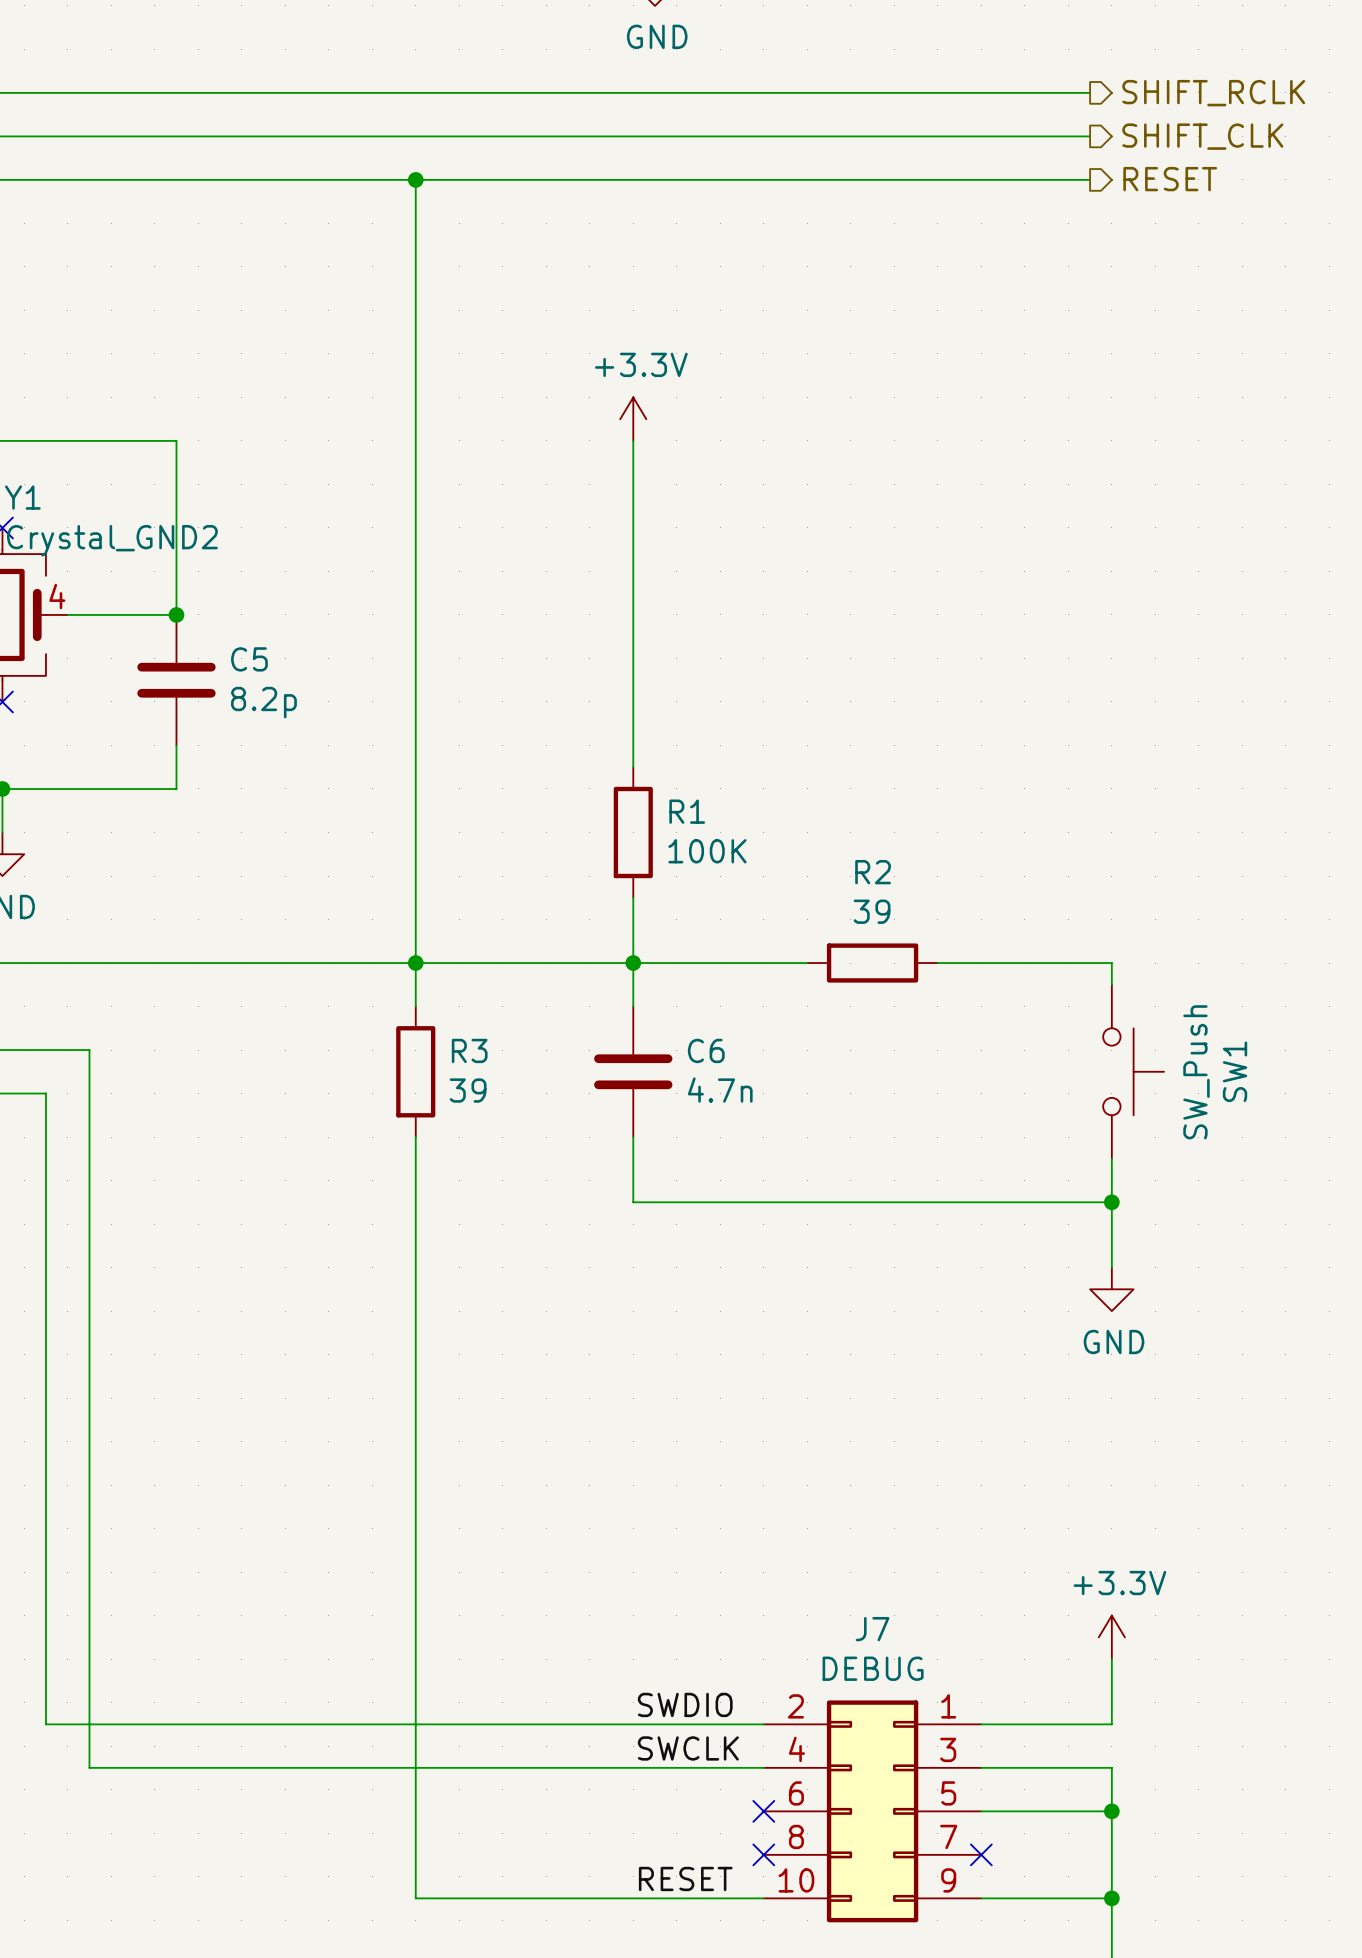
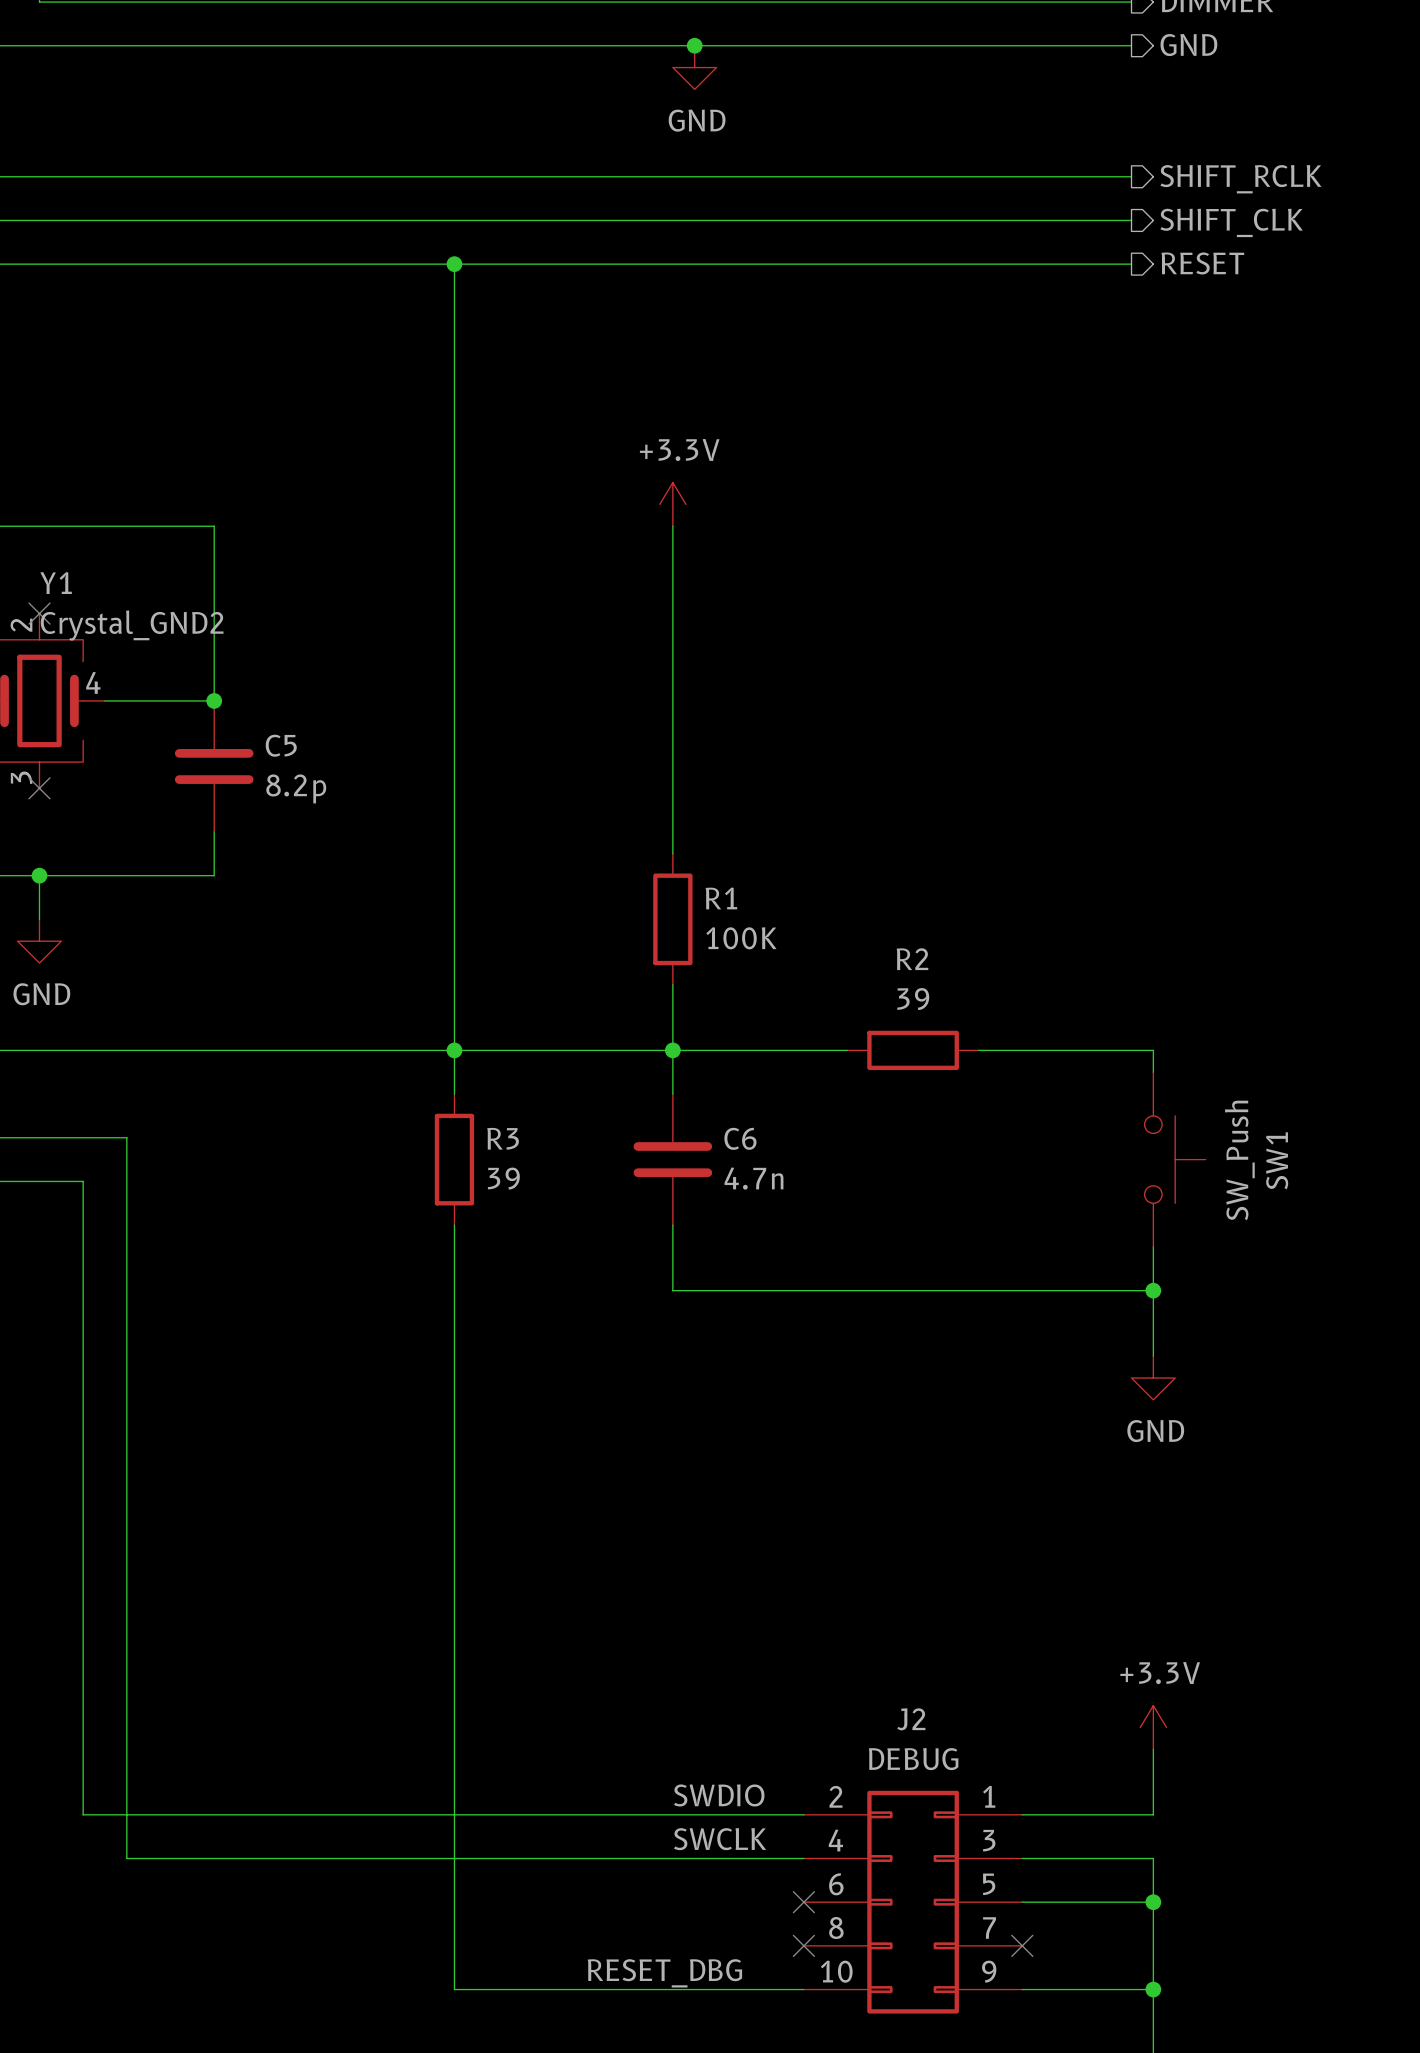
J7 name: J7 (872, 1629) -> J2 (911, 1719)
label: RESET (685, 1878) -> RESET_DBG (664, 1973)

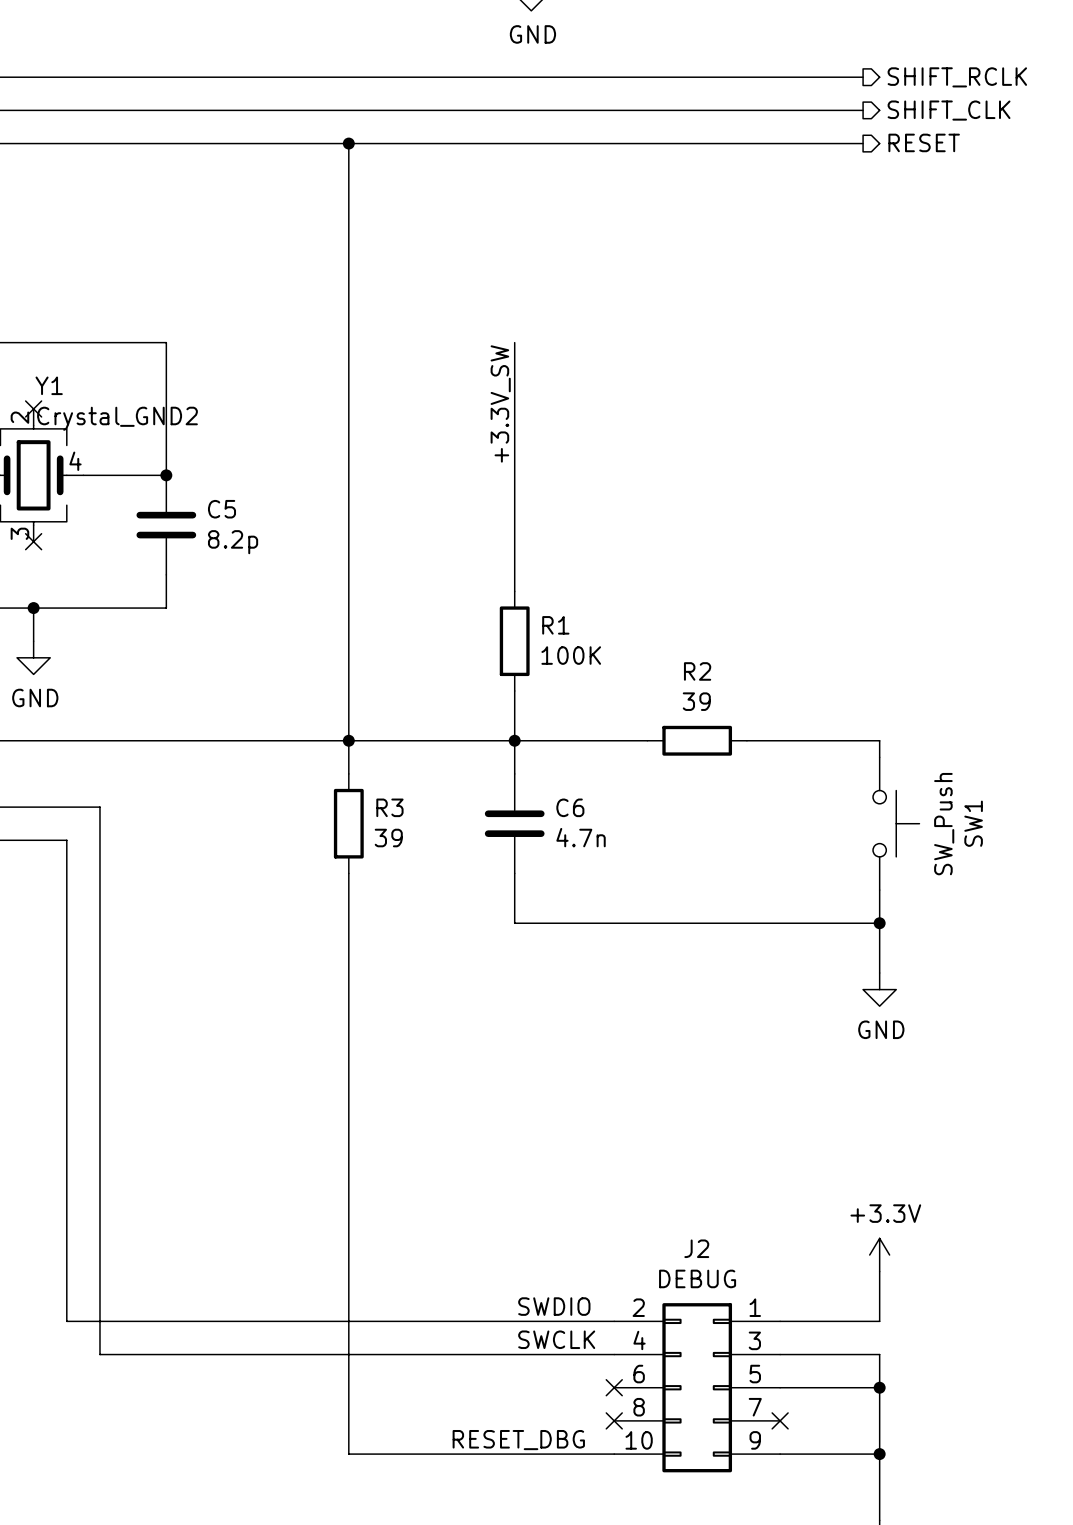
power symbol: +3.3V (672, 504) -> none
label: none -> +3.3V_SW (500, 403)

